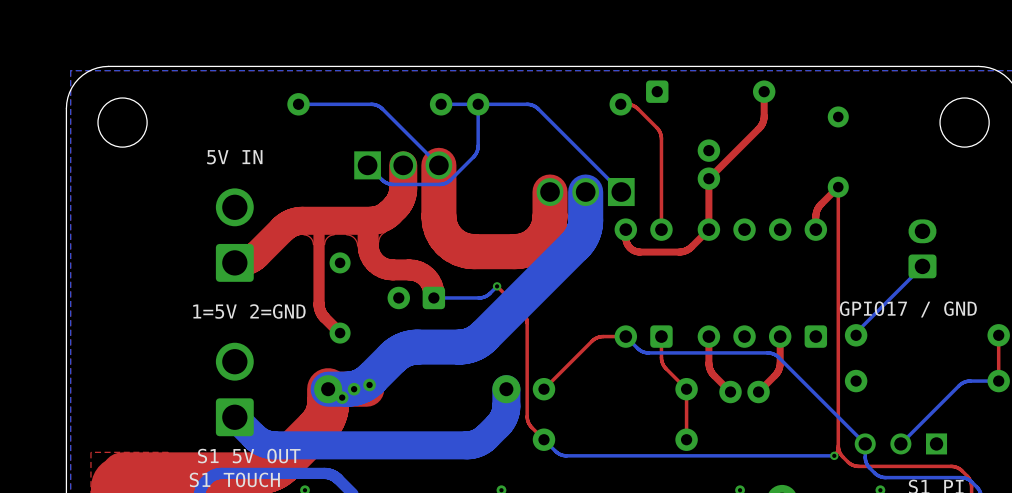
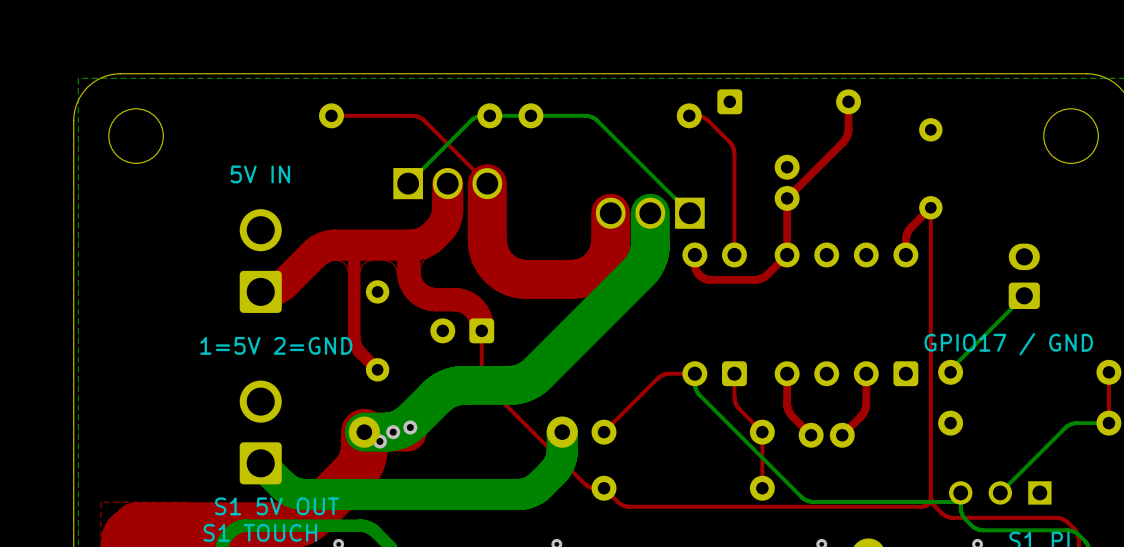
top track: none -> (331, 115) (418, 117) (487, 183)
bottom track: (298, 104) (377, 105) (438, 165) -> none
bottom track: (478, 104) (476, 151) (446, 182) (439, 184) (390, 184) (383, 180) (367, 165) -> (489, 115) (479, 116) (472, 119) (408, 183)
top track: (497, 286) (522, 311) (526, 318) (527, 417) (530, 426) (543, 439) -> none
bottom track: (497, 286) (488, 294) (482, 297) (433, 297) -> none
via: (497, 286) -> none
top track: none -> (481, 330) (481, 375) (485, 384) (585, 484) (592, 487) (604, 488) (623, 505) (921, 506) (930, 502)
bottom track: (625, 336) (638, 349) (647, 352) (773, 354) (865, 443) -> (694, 373) (695, 386) (698, 394) (805, 499) (813, 502) (960, 502)
bottom track: (543, 439) (556, 452) (565, 455) (834, 455) -> none
via: (834, 455) -> none

